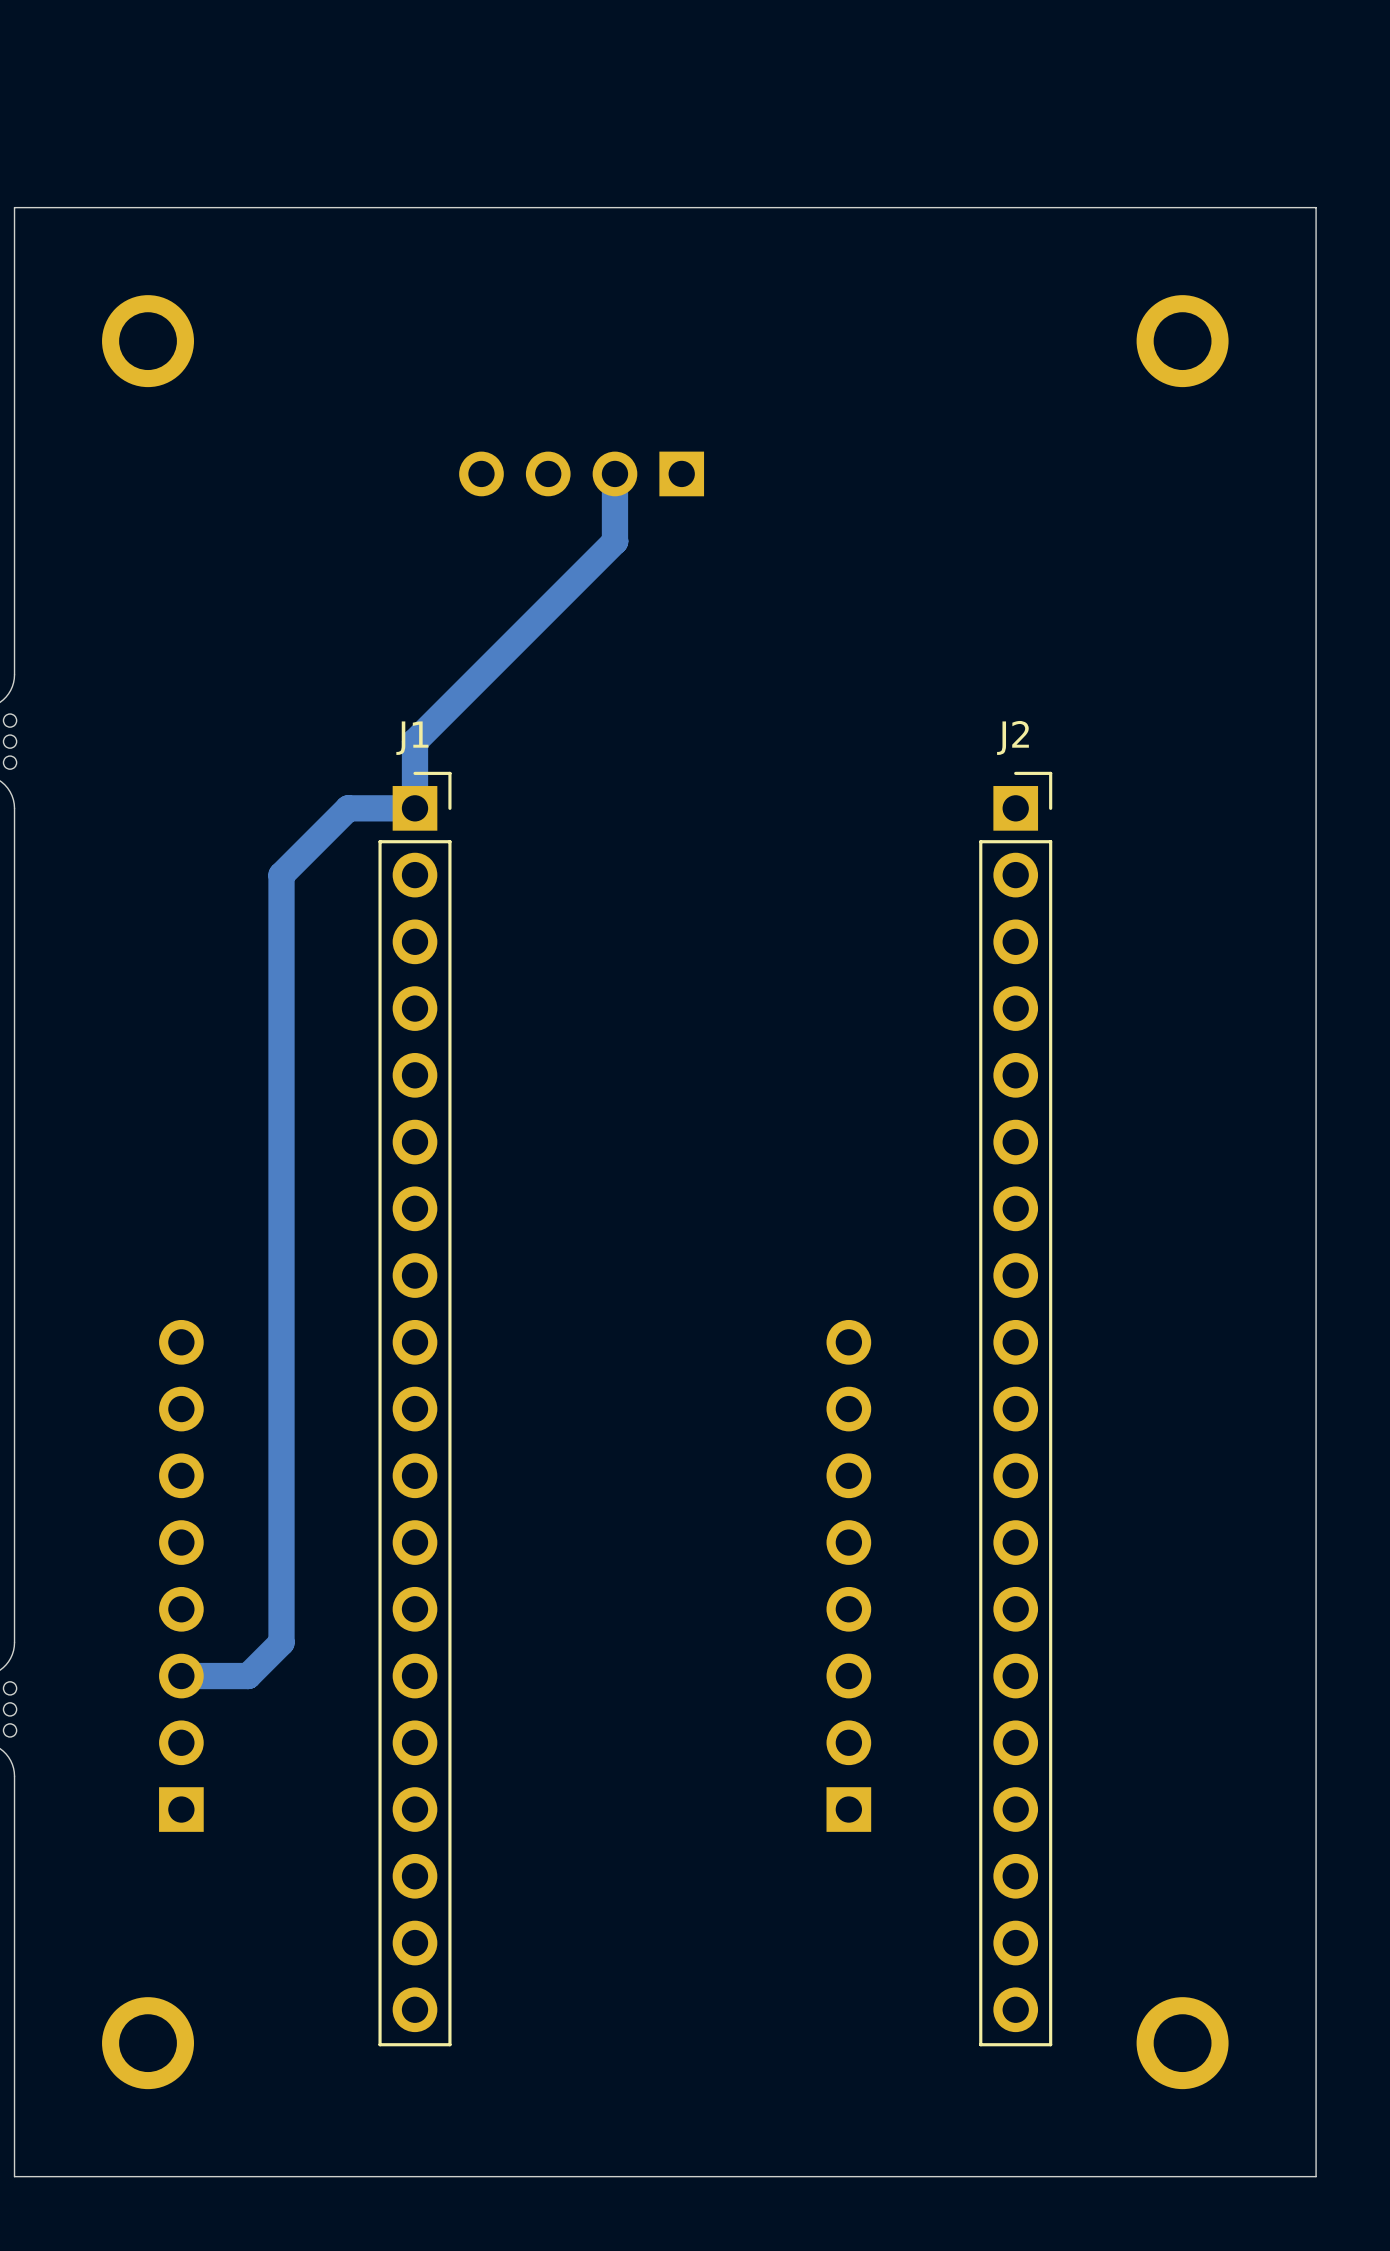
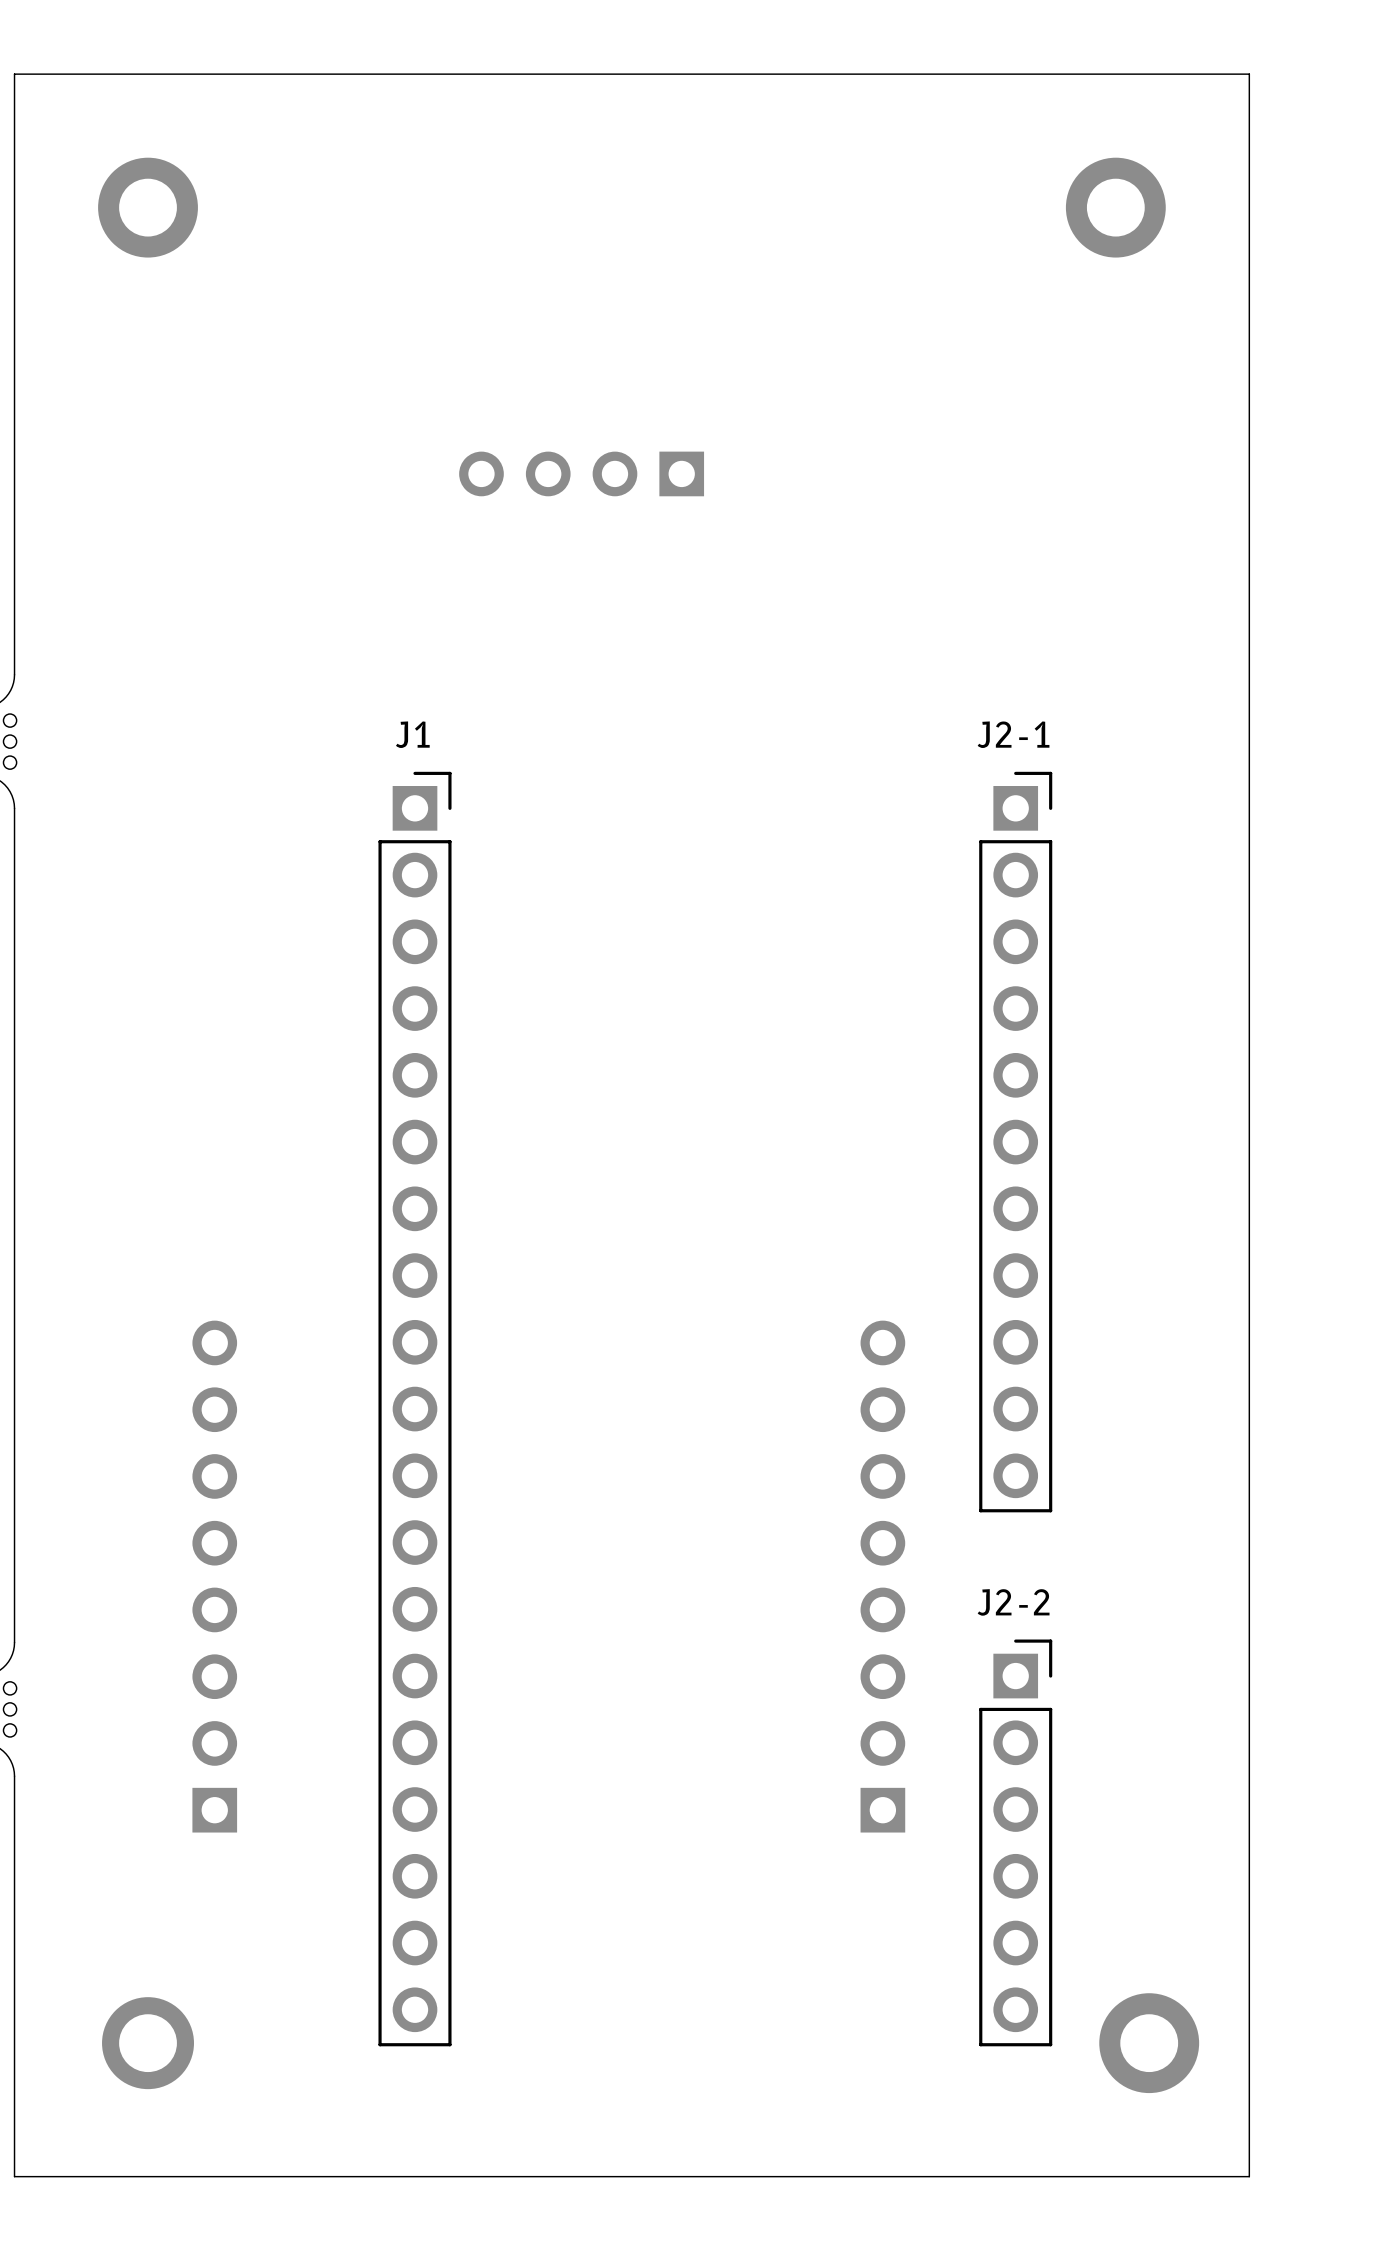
board edge: (14, 207) (1316, 207) (1316, 2176) (1249, 2176) -> (14, 207) (14, 74) (1249, 74) (1249, 2176)
part: none -> (148, 207)
part: none -> (1115, 207)
part: (148, 341) -> none
part: (1182, 341) -> none
track: (614, 473) (614, 541) -> none
track: (615, 541) (415, 741) (415, 808) (348, 808) (281, 875) (281, 1642) (248, 1676) (181, 1676) -> none
J2-1: none -> (1015, 1142)
J2: (1015, 1409) -> none
part position: (181, 1575) -> (214, 1576)
part position: (848, 1575) -> (882, 1576)
J2-2: none -> (1015, 1842)
part: none -> (1149, 2043)
part: (1182, 2043) -> none

